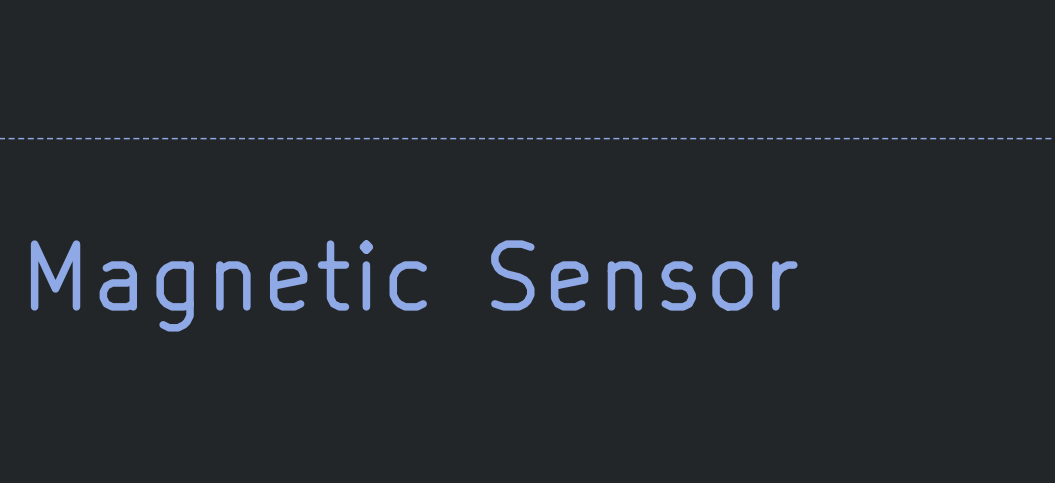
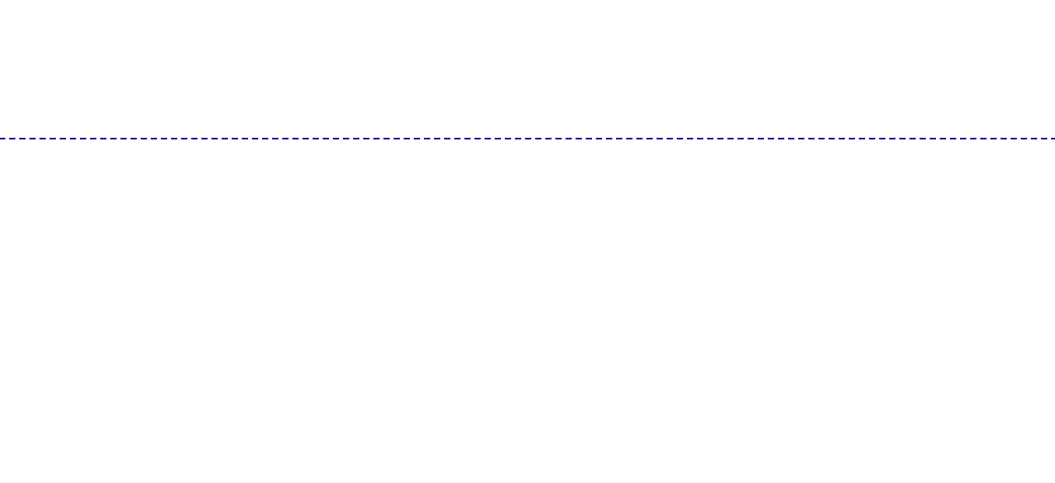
text: Magnetic Sensor (414, 285) -> none

